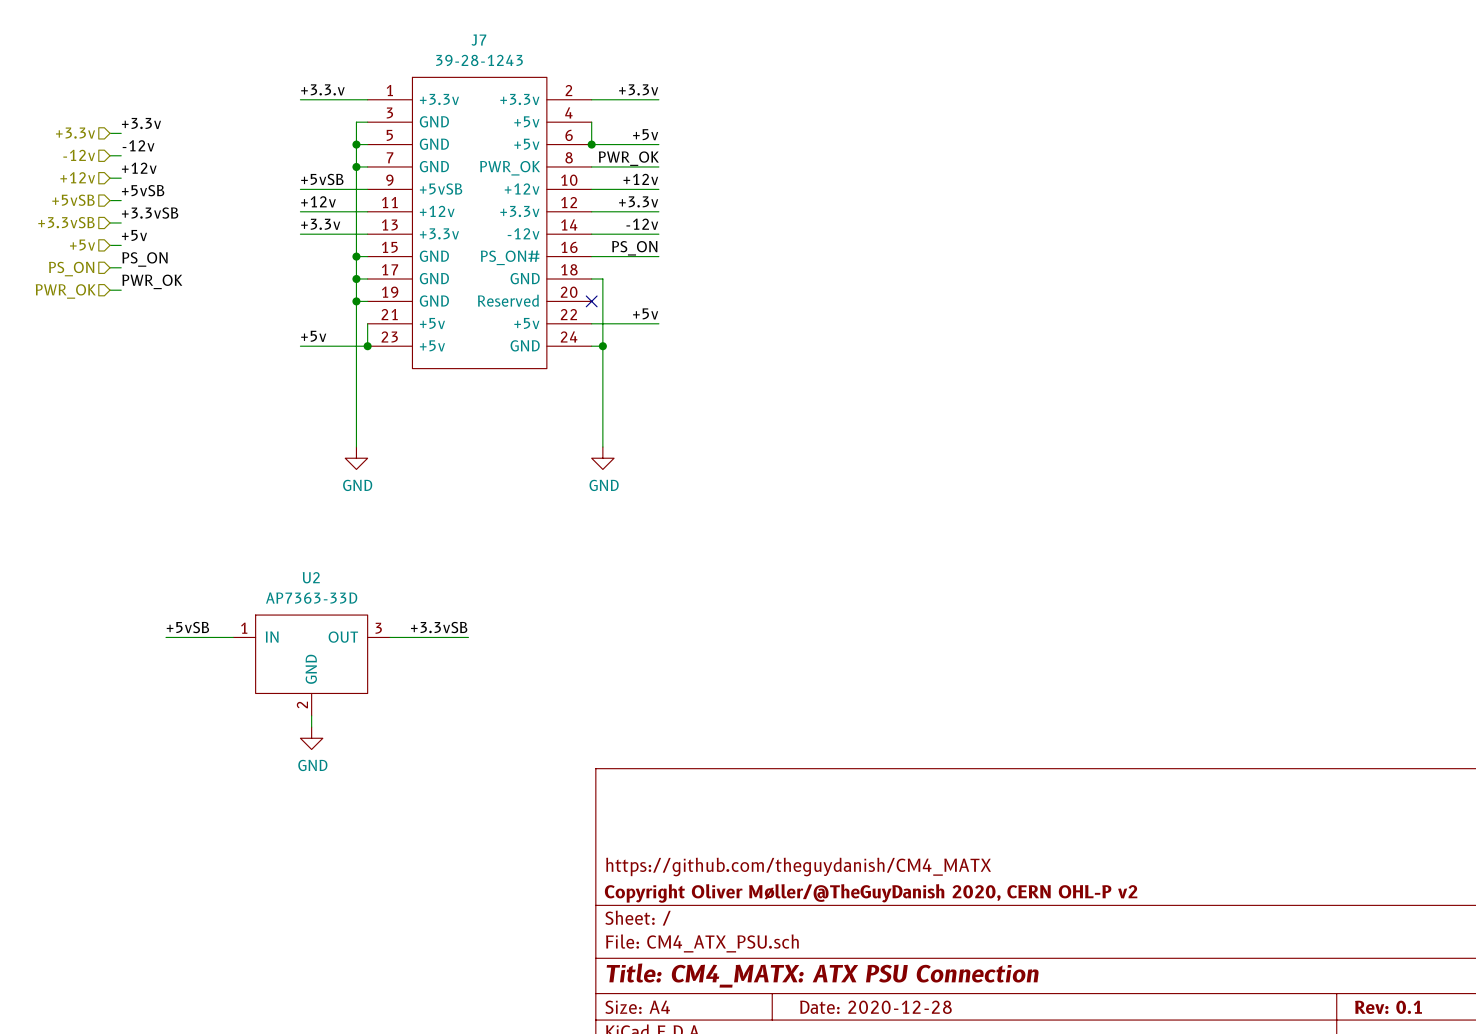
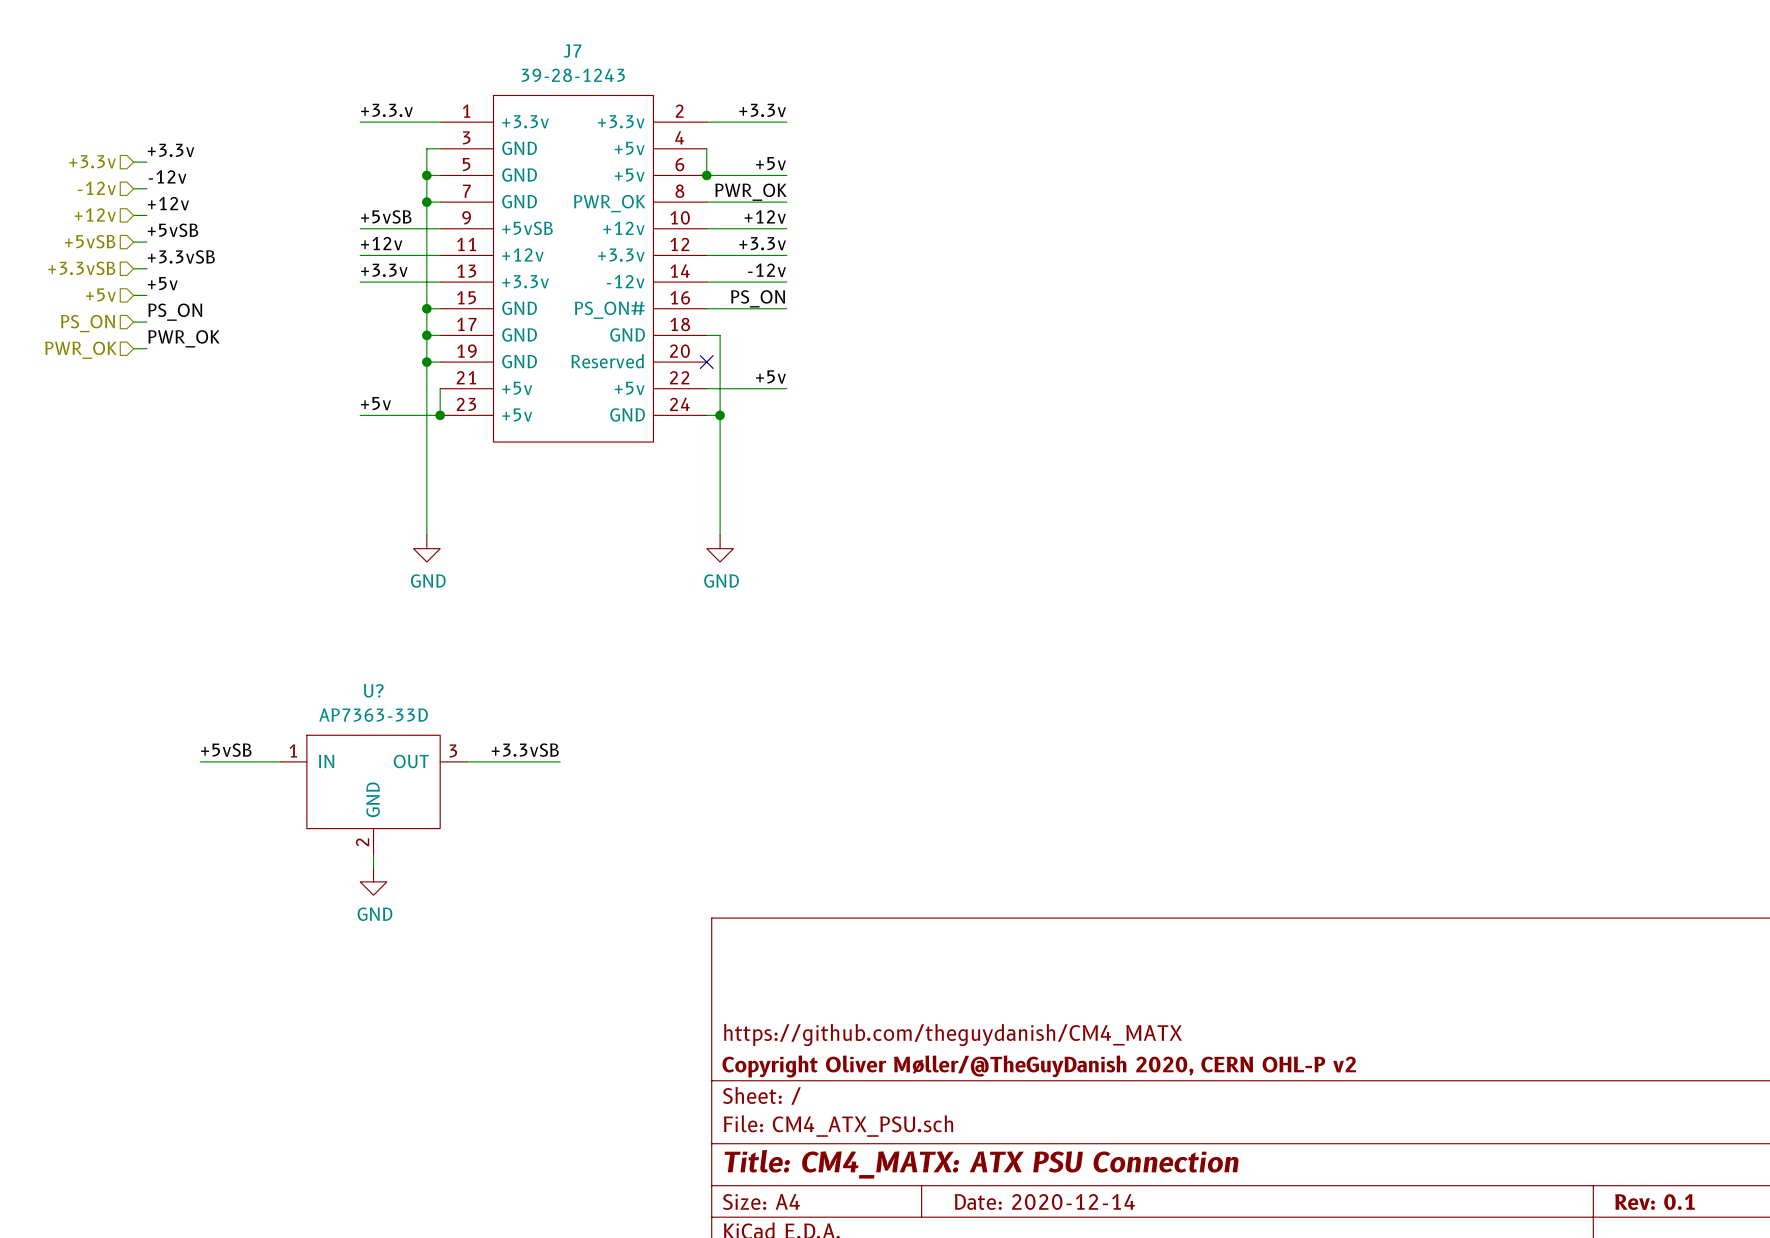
U2 name: U2 (311, 577) -> U? (373, 690)
title block: Date: 2020-12-28 (875, 1007) -> Date: 2020-12-14 (1044, 1201)

